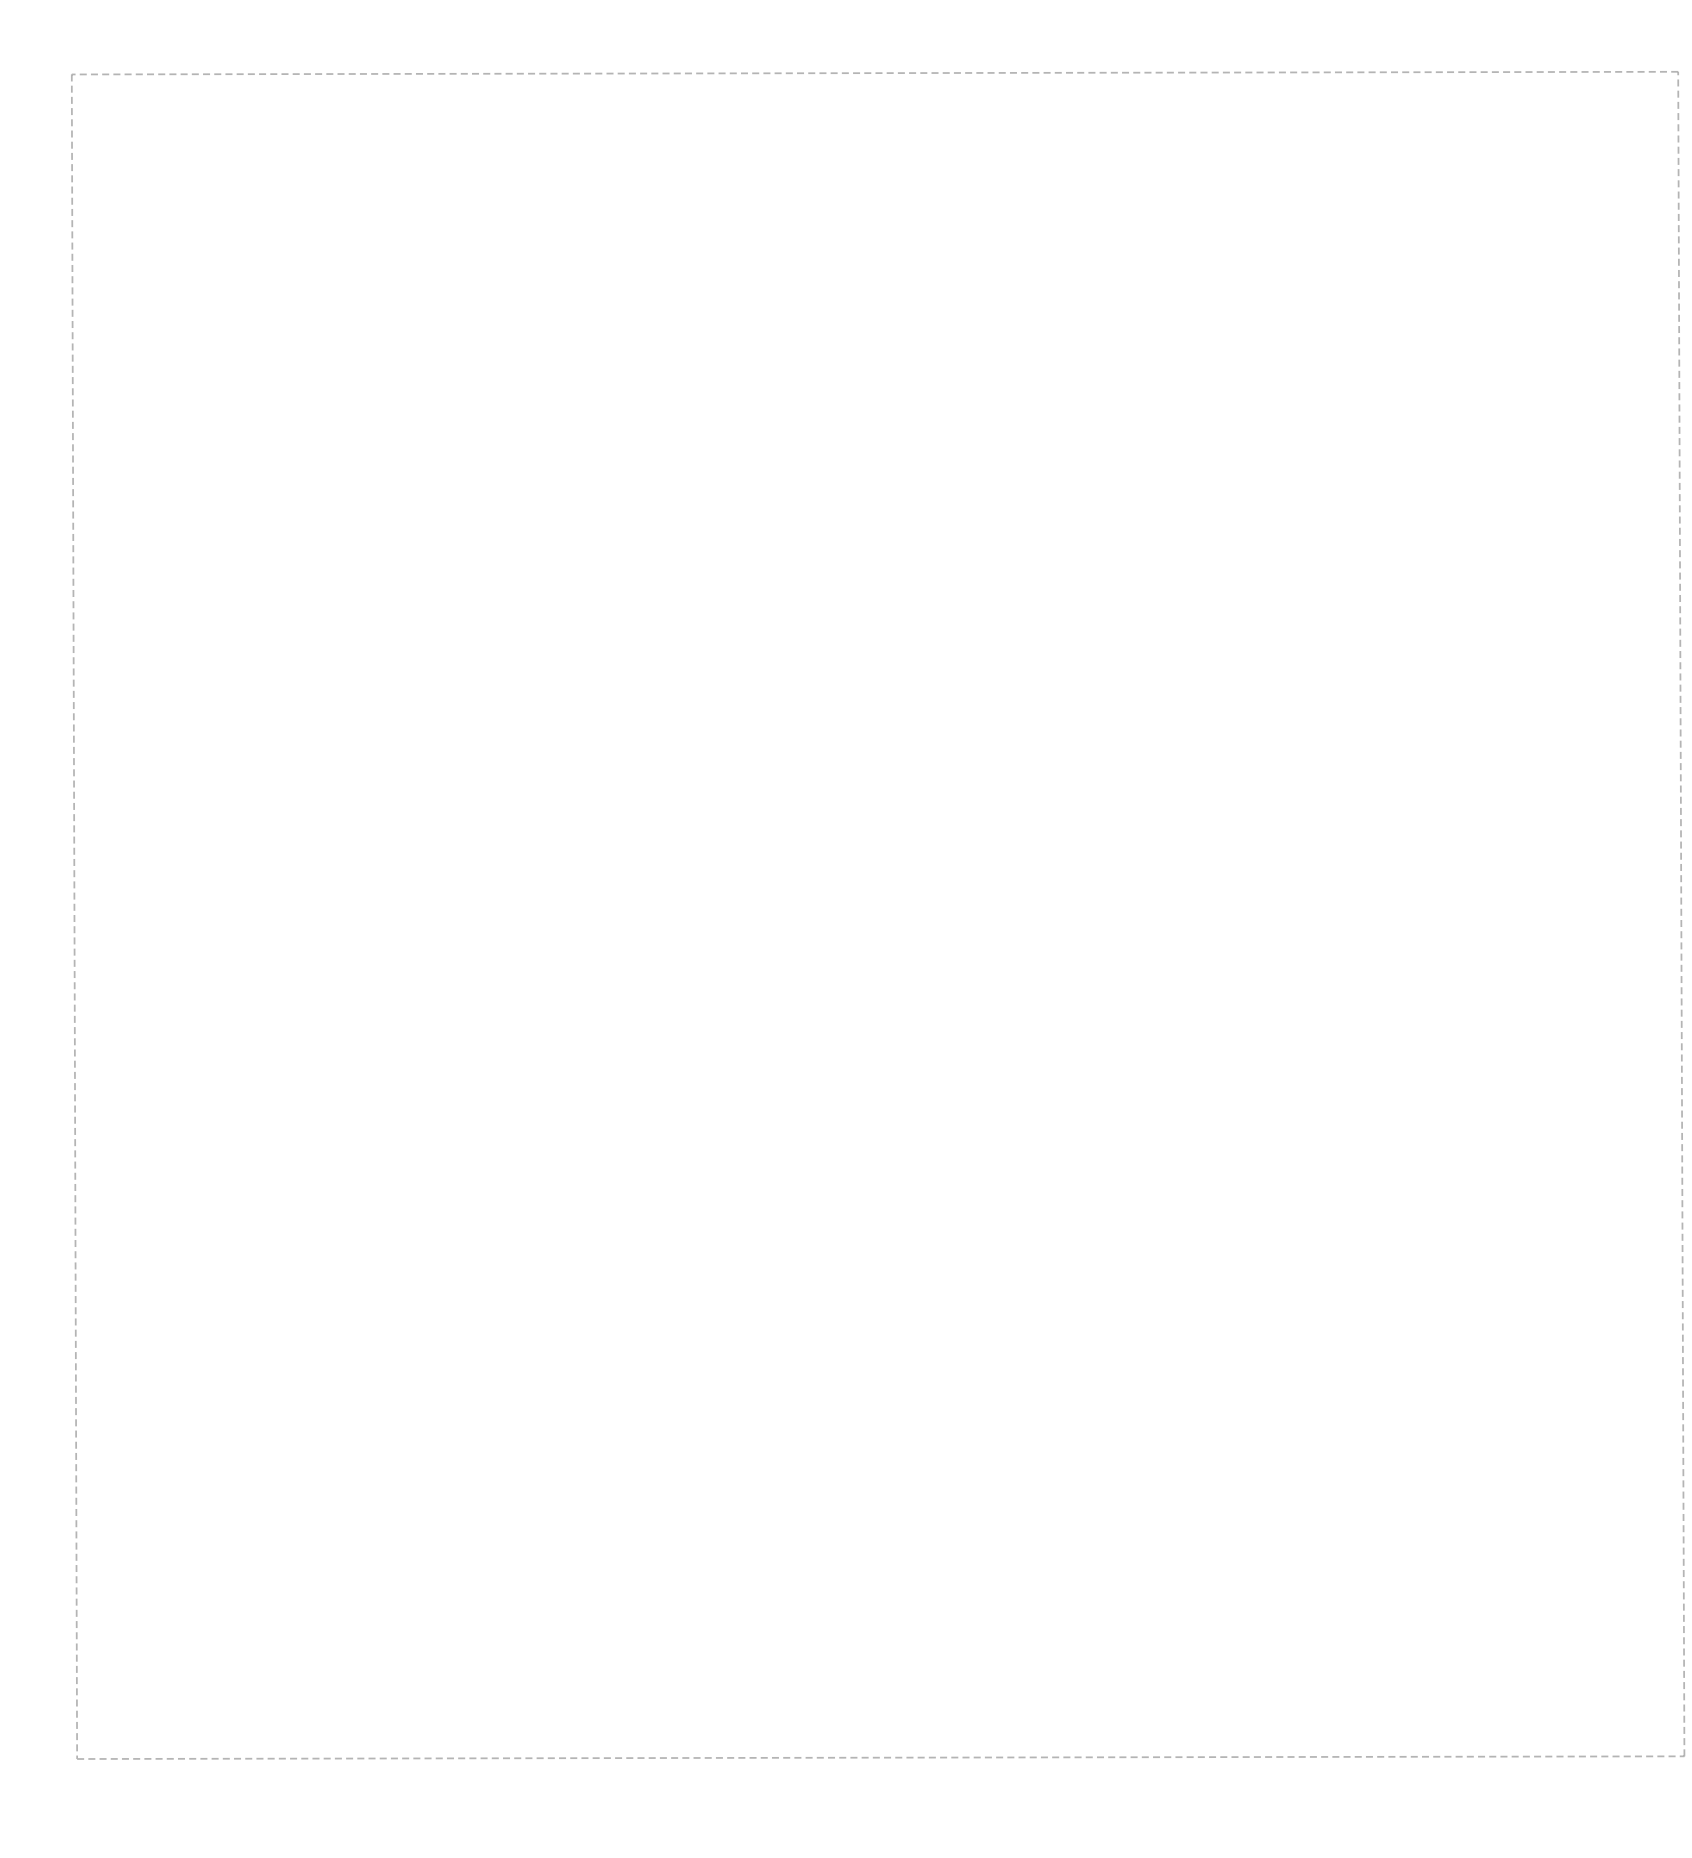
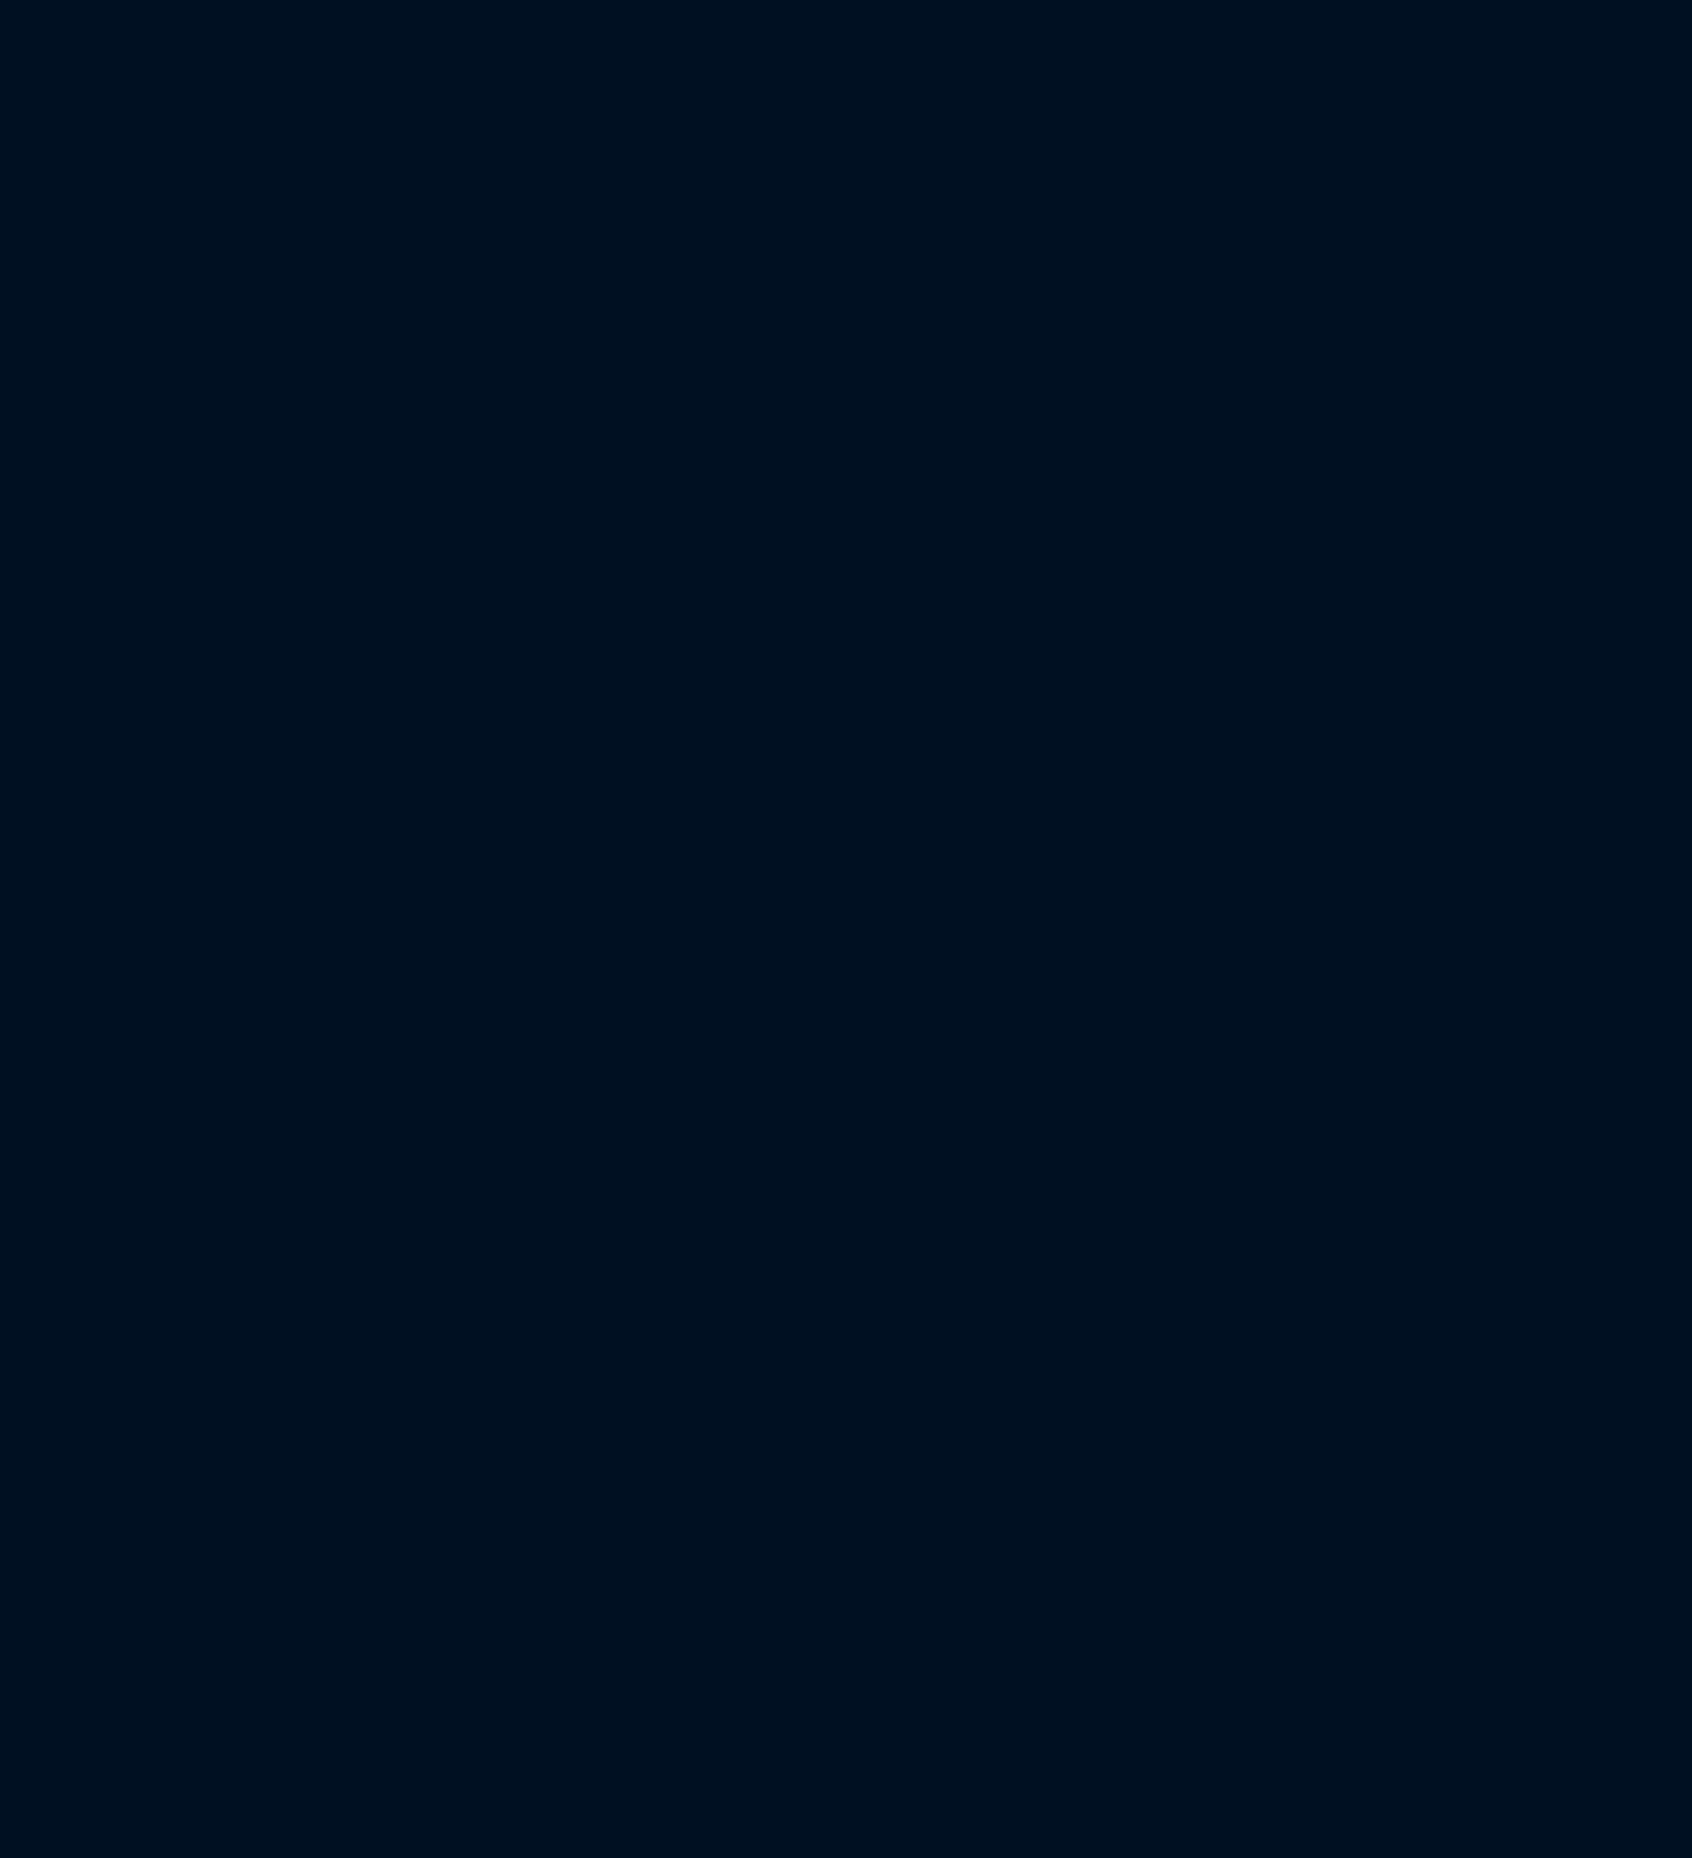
zone outline: (1678, 71) (71, 74) (77, 1759) (1684, 1756) (1678, 71) -> none

